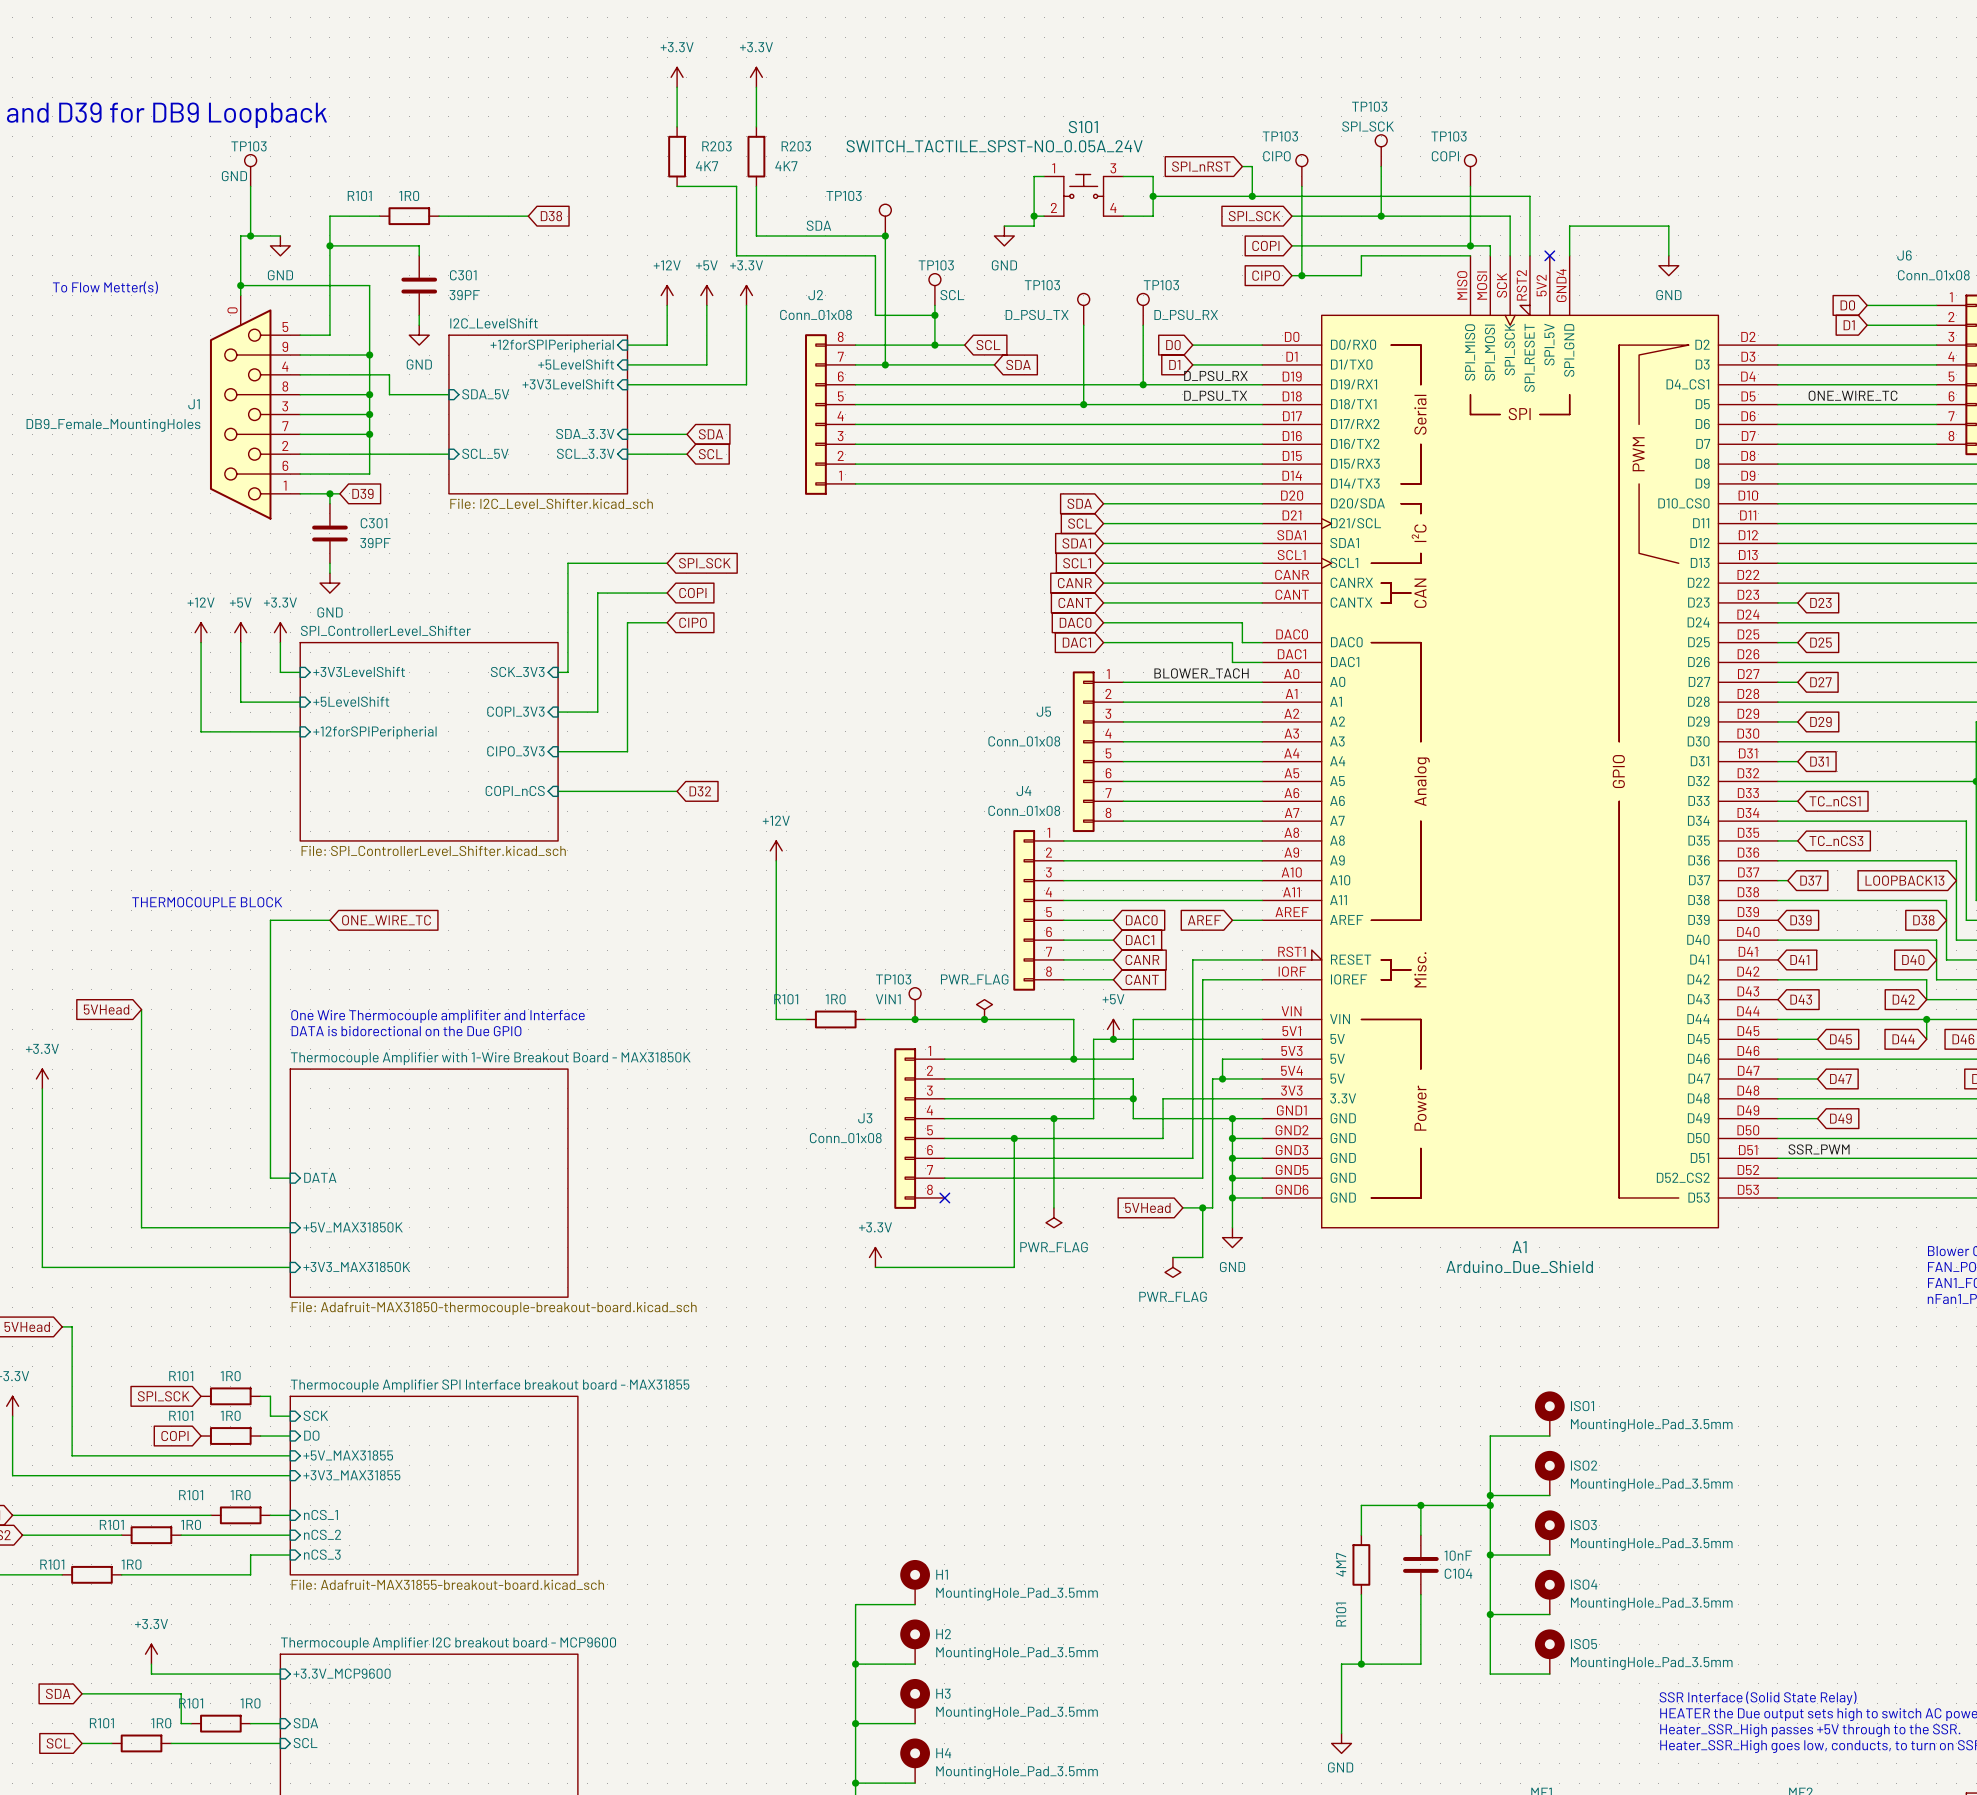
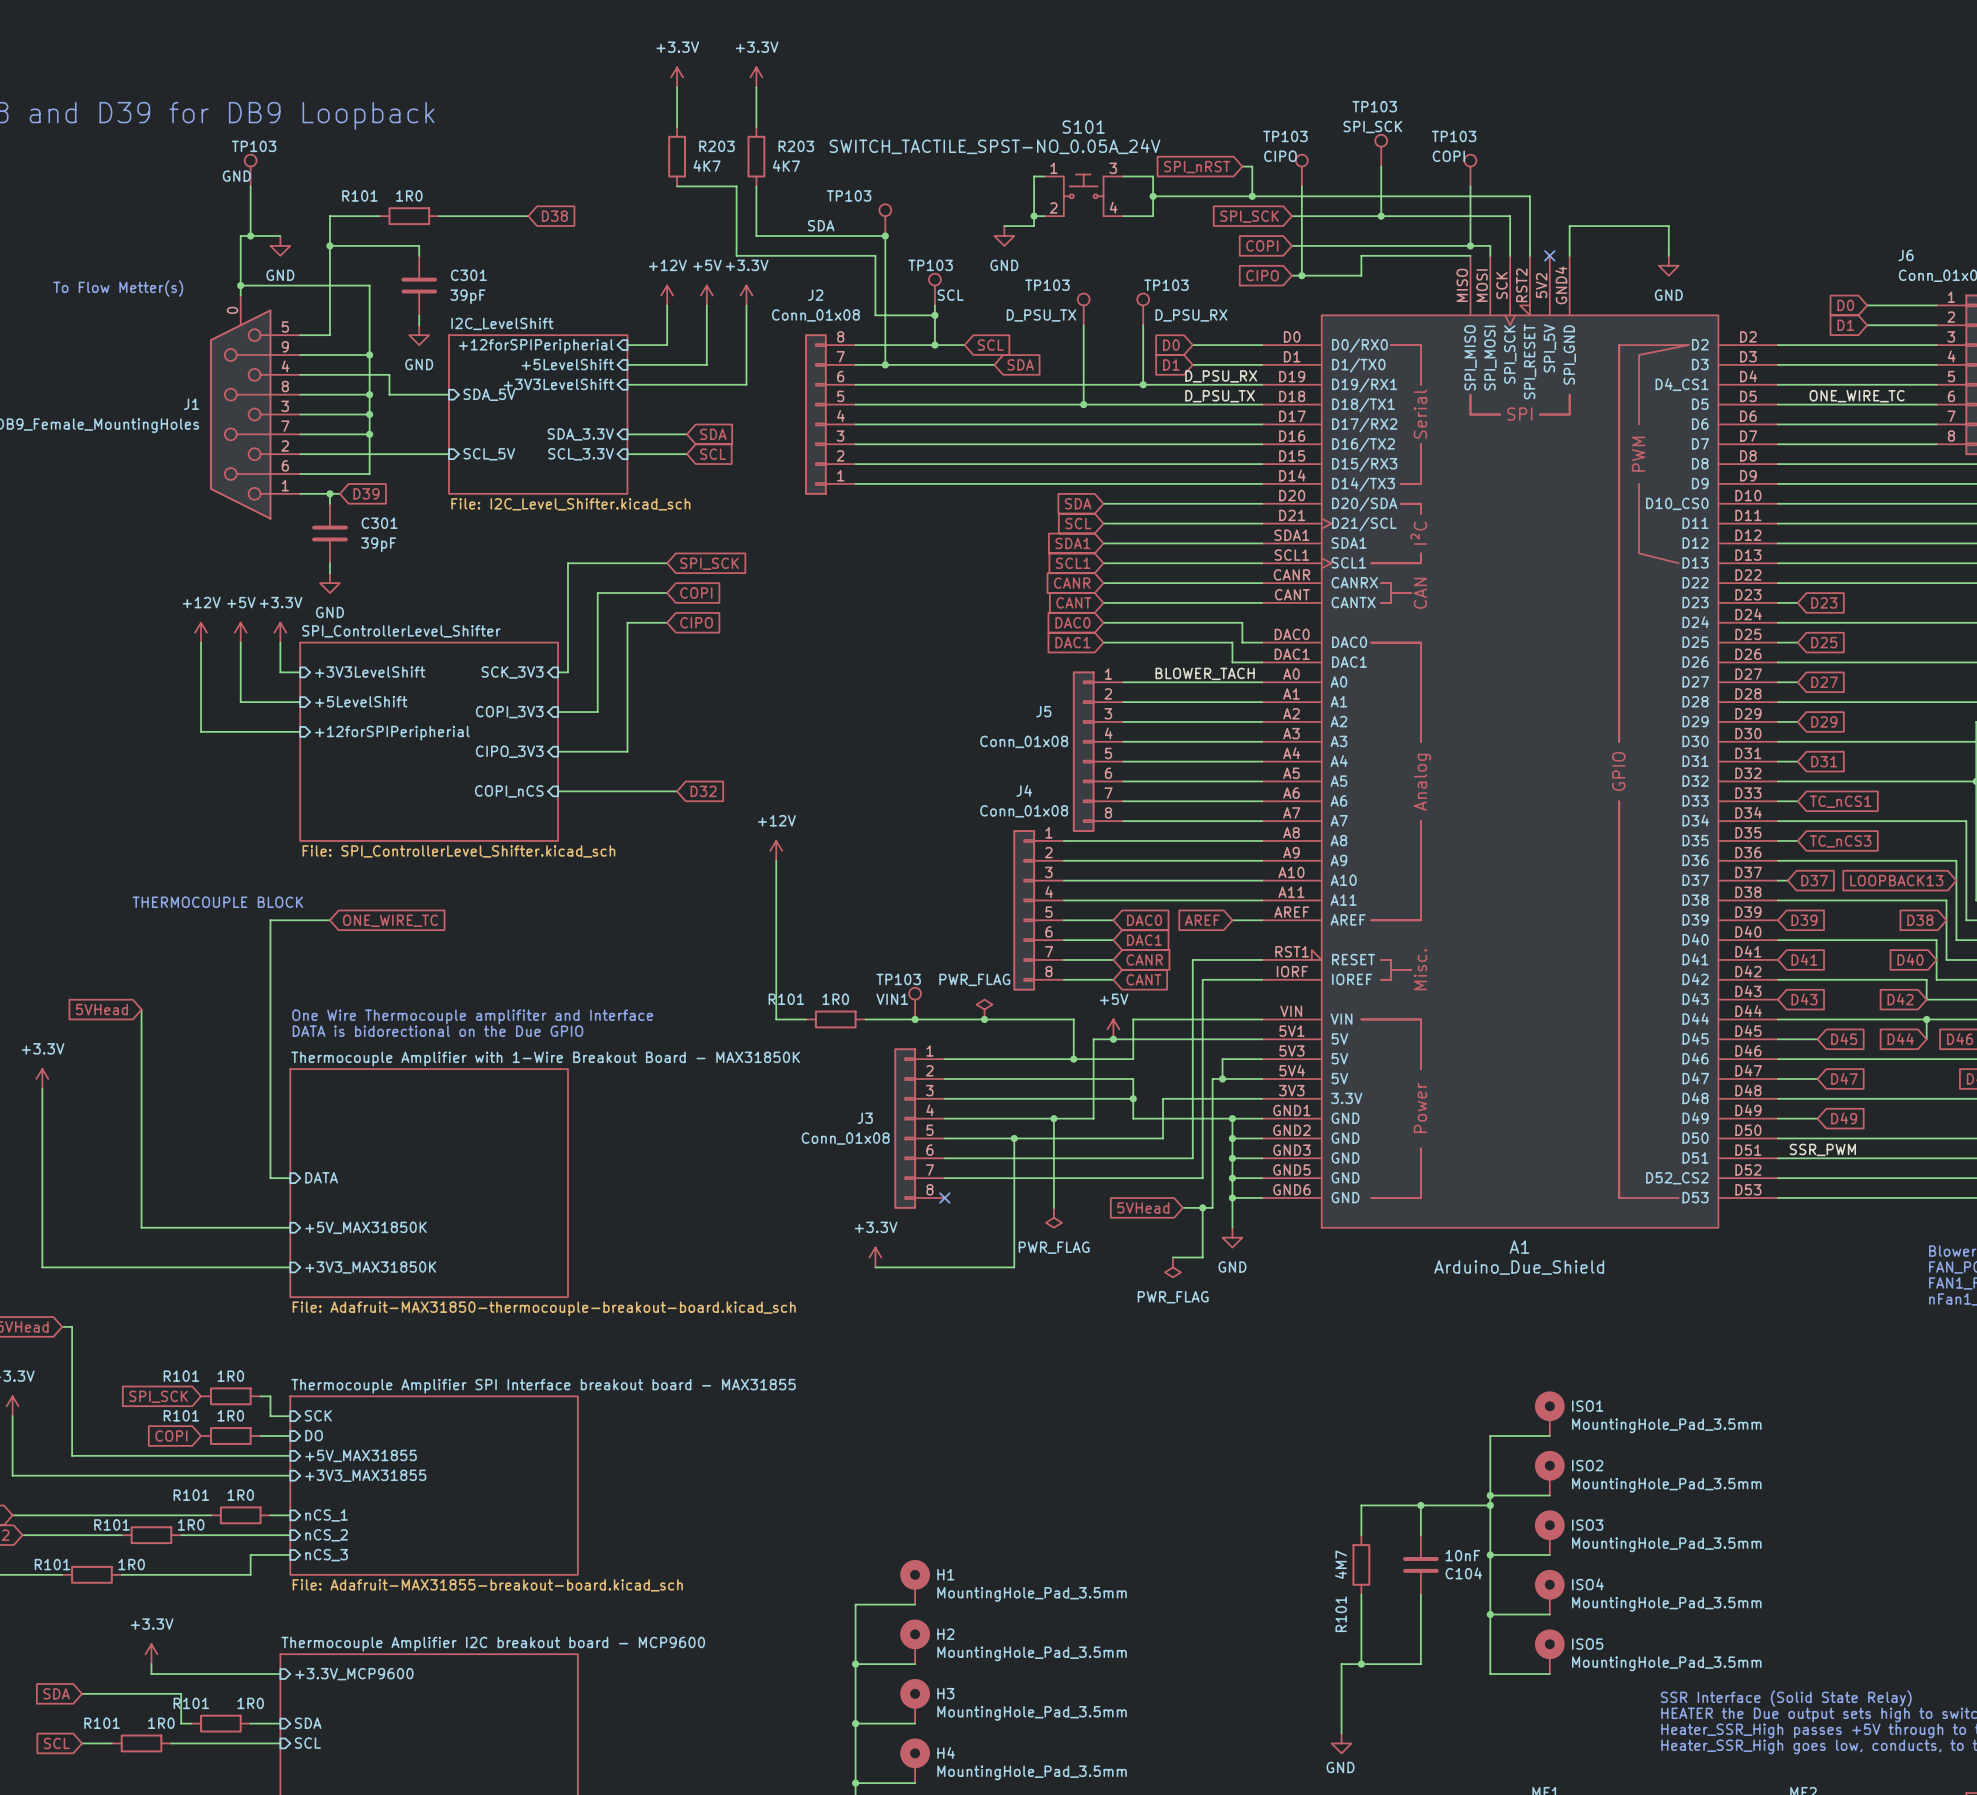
C301 value: 39PF (464, 295) -> 39pF (467, 296)
C301 value: 39PF (375, 543) -> 39pF (378, 544)

